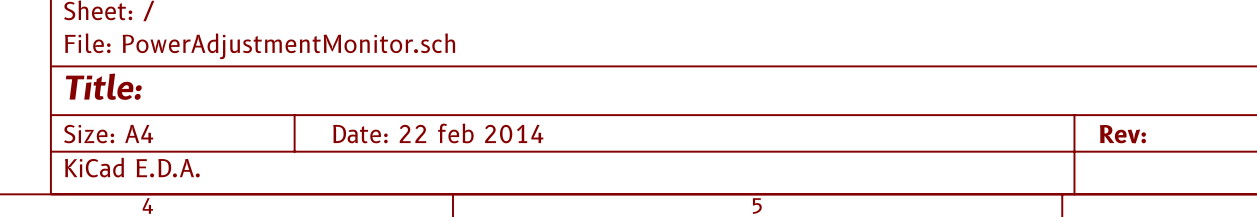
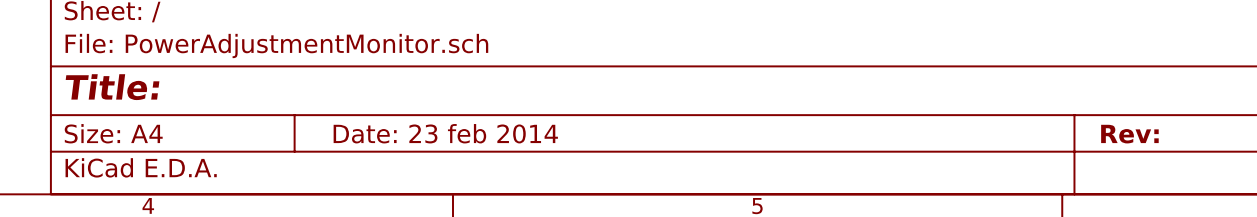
title block: Date: 22 feb 2014 (438, 133) -> Date: 23 feb 2014 (445, 133)

